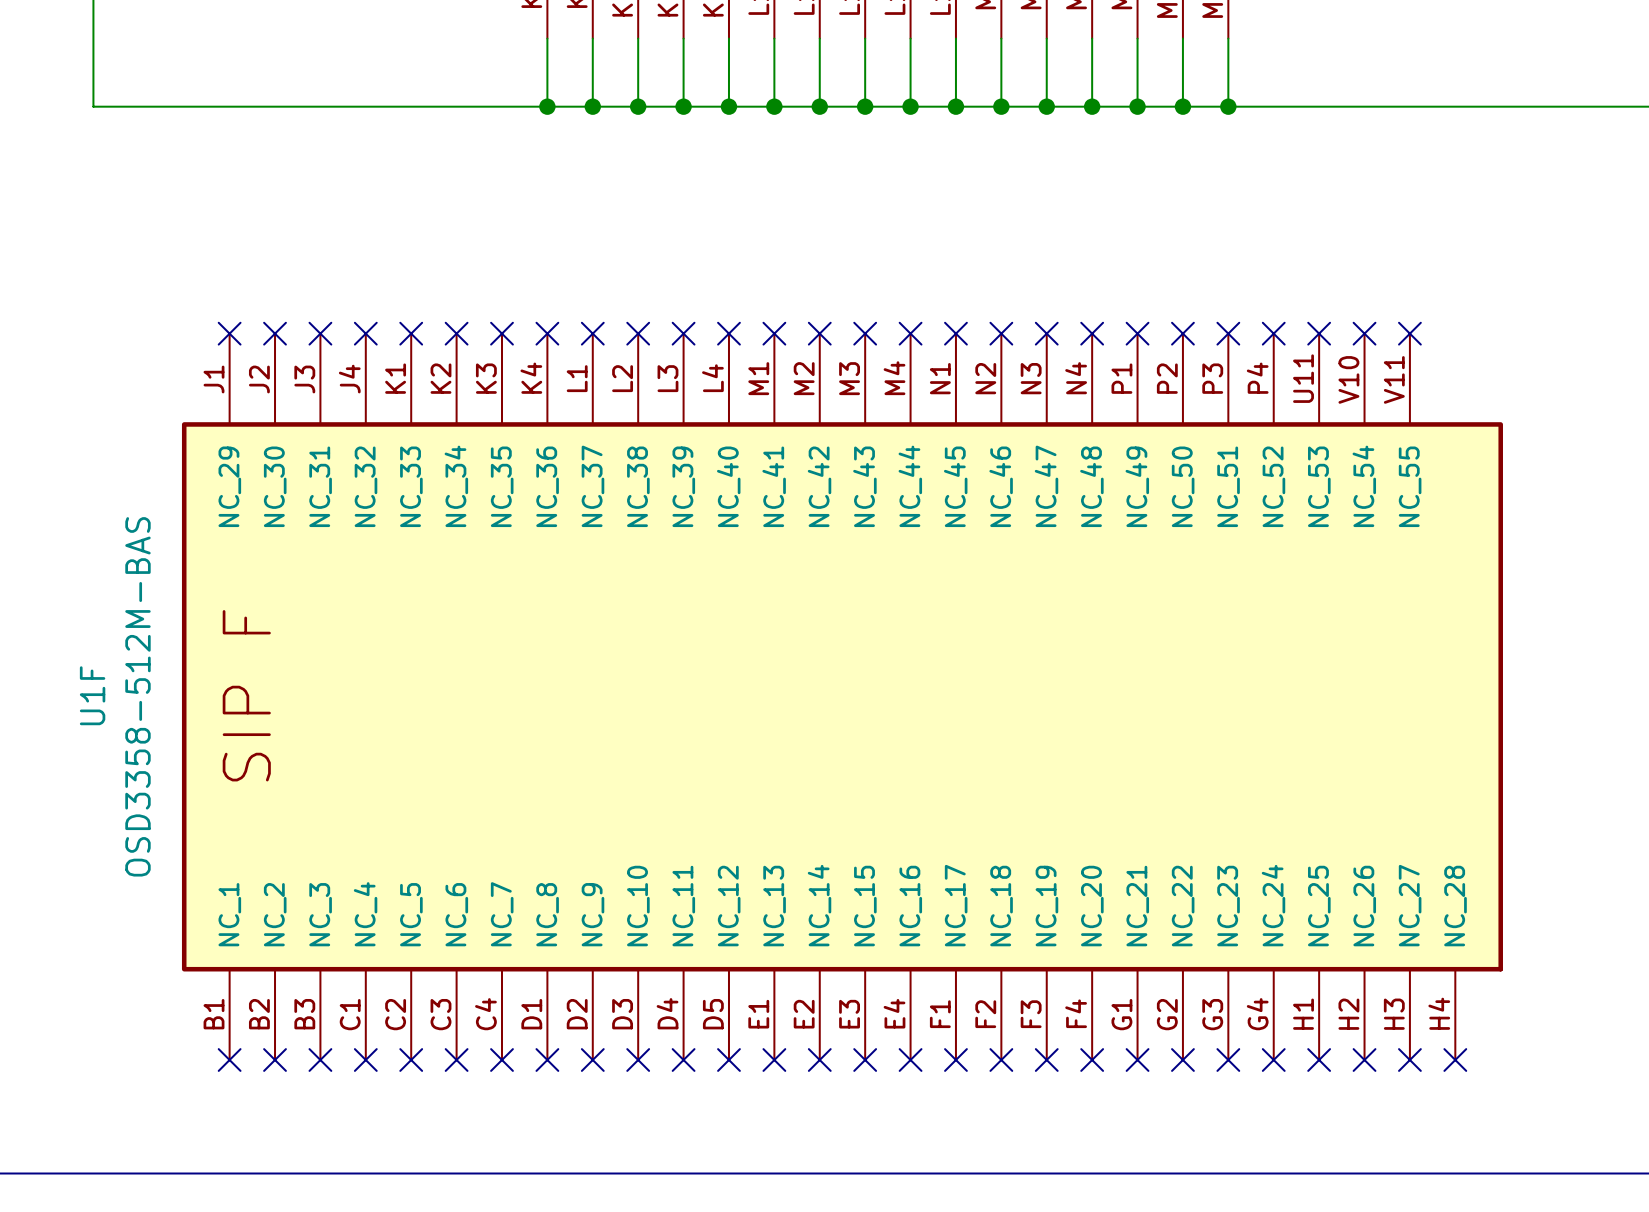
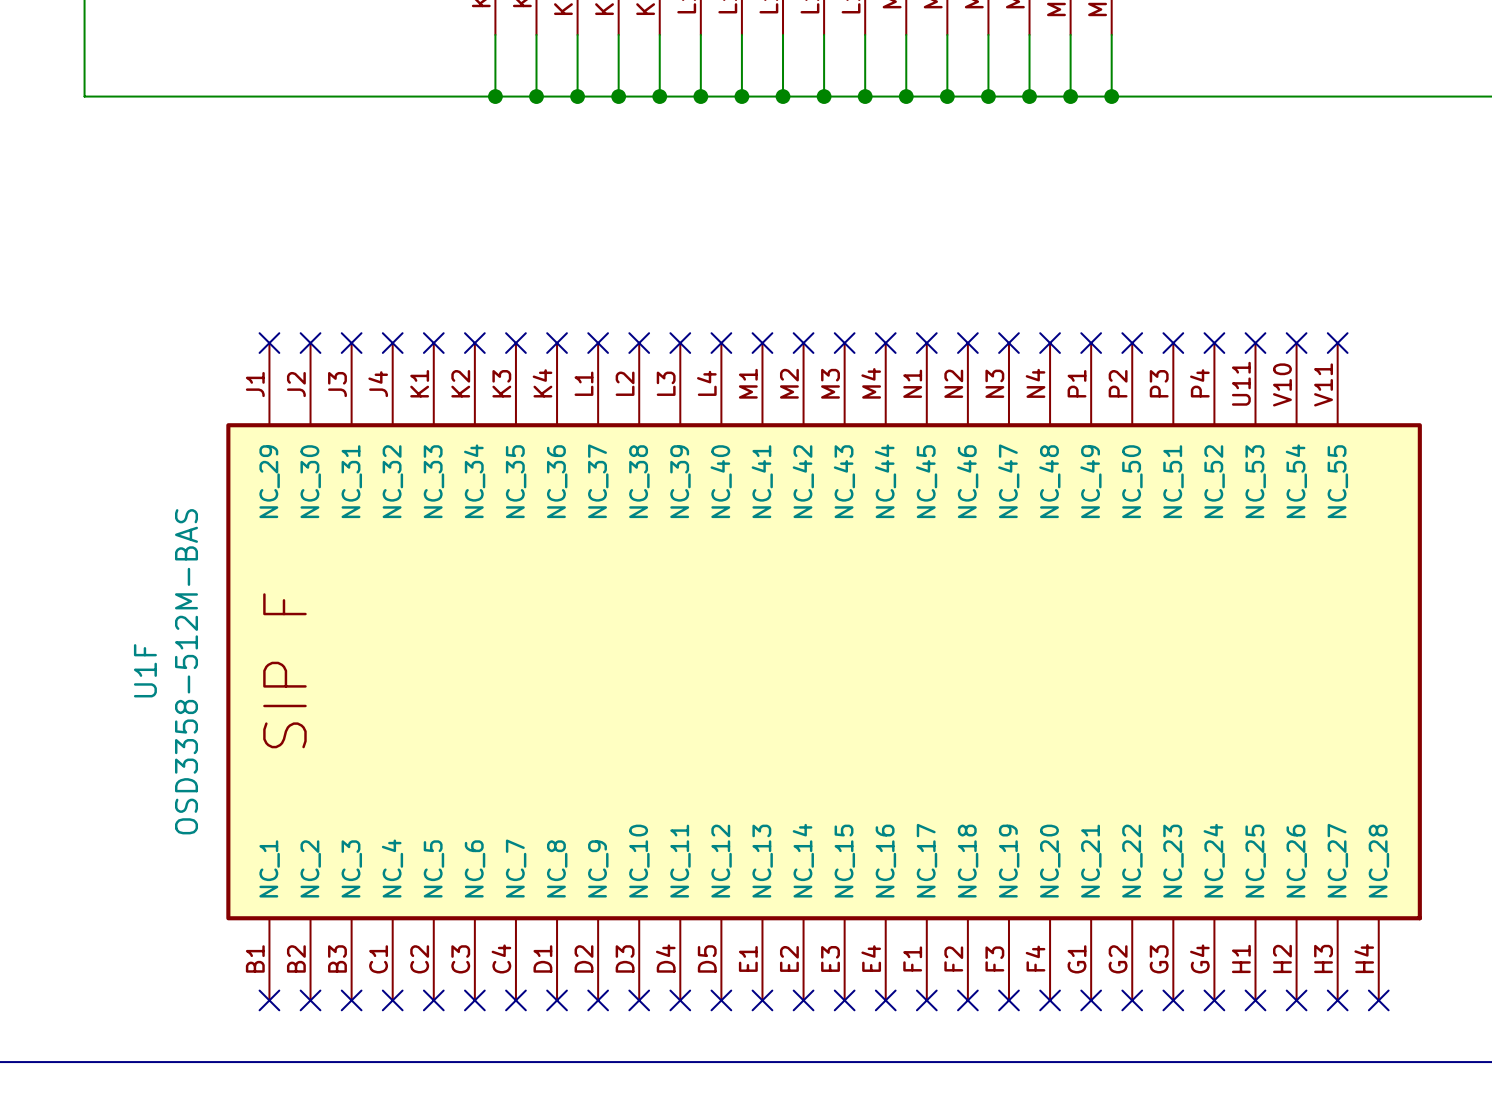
no-connect mark: (229, 333) -> none
no-connect mark: (275, 333) -> none
no-connect mark: (320, 333) -> none
no-connect mark: (365, 333) -> none
no-connect mark: (411, 333) -> none
no-connect mark: (456, 333) -> none
no-connect mark: (502, 333) -> none
no-connect mark: (547, 333) -> none
no-connect mark: (592, 333) -> none
no-connect mark: (638, 333) -> none
no-connect mark: (683, 333) -> none
no-connect mark: (728, 333) -> none
no-connect mark: (774, 333) -> none
no-connect mark: (819, 333) -> none
no-connect mark: (865, 333) -> none
no-connect mark: (910, 333) -> none
no-connect mark: (955, 333) -> none
no-connect mark: (1001, 333) -> none
no-connect mark: (1046, 333) -> none
no-connect mark: (1092, 333) -> none
no-connect mark: (1137, 333) -> none
no-connect mark: (1182, 333) -> none
no-connect mark: (1228, 333) -> none
no-connect mark: (1273, 333) -> none
no-connect mark: (1319, 333) -> none
no-connect mark: (1364, 333) -> none
no-connect mark: (1409, 333) -> none
no-connect mark: none -> (269, 343)
no-connect mark: none -> (310, 343)
no-connect mark: none -> (351, 343)
no-connect mark: none -> (392, 343)
no-connect mark: none -> (433, 343)
no-connect mark: none -> (474, 343)
no-connect mark: none -> (515, 343)
no-connect mark: none -> (557, 343)
no-connect mark: none -> (598, 343)
no-connect mark: none -> (639, 343)
no-connect mark: none -> (680, 343)
no-connect mark: none -> (721, 343)
no-connect mark: none -> (762, 343)
no-connect mark: none -> (803, 343)
no-connect mark: none -> (844, 343)
no-connect mark: none -> (885, 343)
no-connect mark: none -> (926, 343)
no-connect mark: none -> (967, 343)
no-connect mark: none -> (1008, 343)
no-connect mark: none -> (1050, 343)
no-connect mark: none -> (1091, 343)
no-connect mark: none -> (1132, 343)
no-connect mark: none -> (1173, 343)
no-connect mark: none -> (1214, 343)
no-connect mark: none -> (1255, 343)
no-connect mark: none -> (1296, 343)
no-connect mark: none -> (1337, 343)
U1F position: (842, 696) -> (824, 671)
no-connect mark: (229, 1060) -> none
no-connect mark: (275, 1060) -> none
no-connect mark: (320, 1060) -> none
no-connect mark: (365, 1060) -> none
no-connect mark: (411, 1060) -> none
no-connect mark: (456, 1060) -> none
no-connect mark: (502, 1060) -> none
no-connect mark: (547, 1060) -> none
no-connect mark: (592, 1060) -> none
no-connect mark: (638, 1060) -> none
no-connect mark: (683, 1060) -> none
no-connect mark: (728, 1060) -> none
no-connect mark: (774, 1060) -> none
no-connect mark: (819, 1060) -> none
no-connect mark: (865, 1060) -> none
no-connect mark: (910, 1060) -> none
no-connect mark: (955, 1060) -> none
no-connect mark: (1001, 1060) -> none
no-connect mark: (1046, 1060) -> none
no-connect mark: (1092, 1060) -> none
no-connect mark: (1137, 1060) -> none
no-connect mark: (1182, 1060) -> none
no-connect mark: (1228, 1060) -> none
no-connect mark: (1273, 1060) -> none
no-connect mark: (1319, 1060) -> none
no-connect mark: (1364, 1060) -> none
no-connect mark: (1409, 1060) -> none
no-connect mark: (1455, 1060) -> none
no-connect mark: none -> (269, 1000)
no-connect mark: none -> (310, 1000)
no-connect mark: none -> (351, 1000)
no-connect mark: none -> (392, 1000)
no-connect mark: none -> (433, 1000)
no-connect mark: none -> (474, 1000)
no-connect mark: none -> (515, 1000)
no-connect mark: none -> (557, 1000)
no-connect mark: none -> (598, 1000)
no-connect mark: none -> (639, 1000)
no-connect mark: none -> (680, 1000)
no-connect mark: none -> (721, 1000)
no-connect mark: none -> (762, 1000)
no-connect mark: none -> (803, 1000)
no-connect mark: none -> (844, 1000)
no-connect mark: none -> (885, 1000)
no-connect mark: none -> (926, 1000)
no-connect mark: none -> (967, 1000)
no-connect mark: none -> (1008, 1000)
no-connect mark: none -> (1050, 1000)
no-connect mark: none -> (1091, 1000)
no-connect mark: none -> (1132, 1000)
no-connect mark: none -> (1173, 1000)
no-connect mark: none -> (1214, 1000)
no-connect mark: none -> (1255, 1000)
no-connect mark: none -> (1296, 1000)
no-connect mark: none -> (1337, 1000)
no-connect mark: none -> (1378, 1000)

